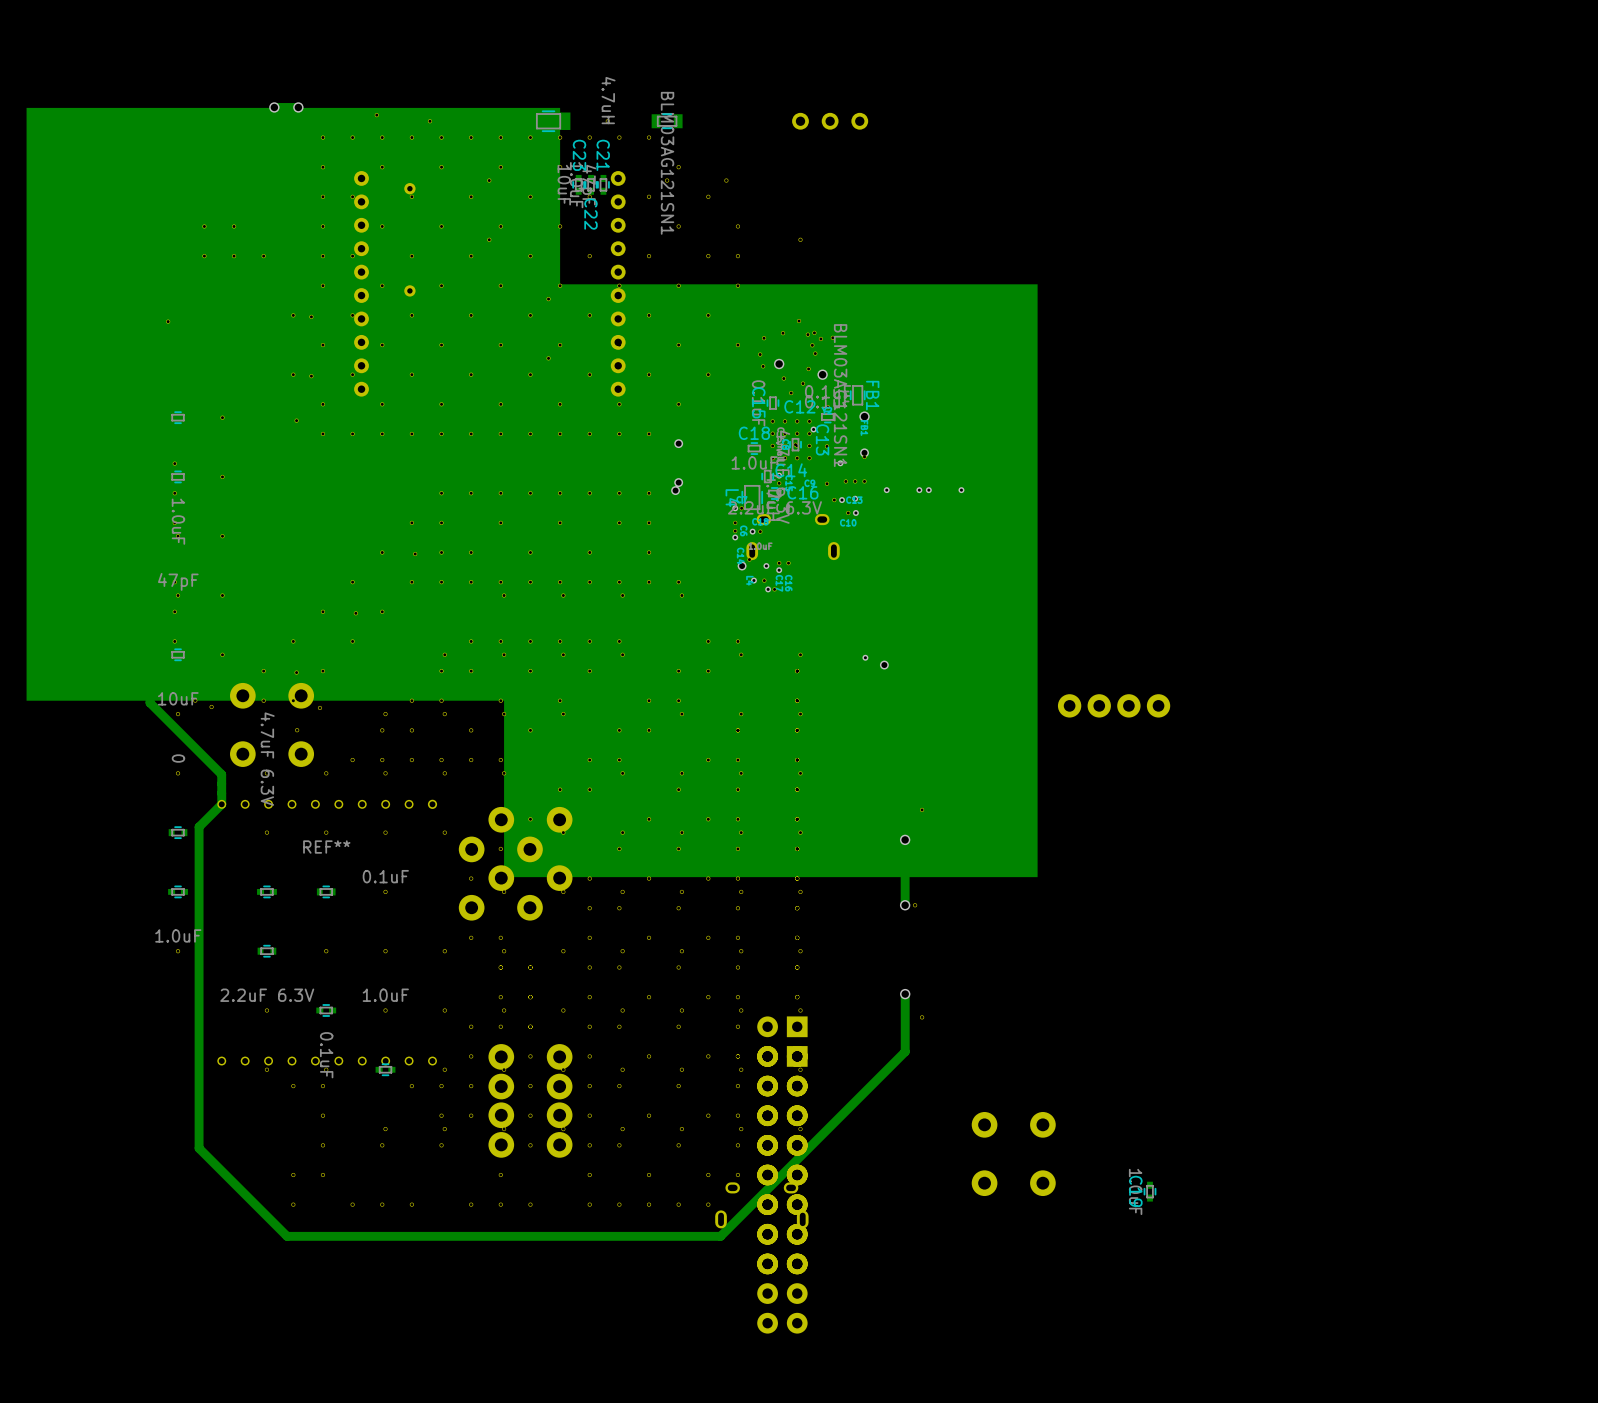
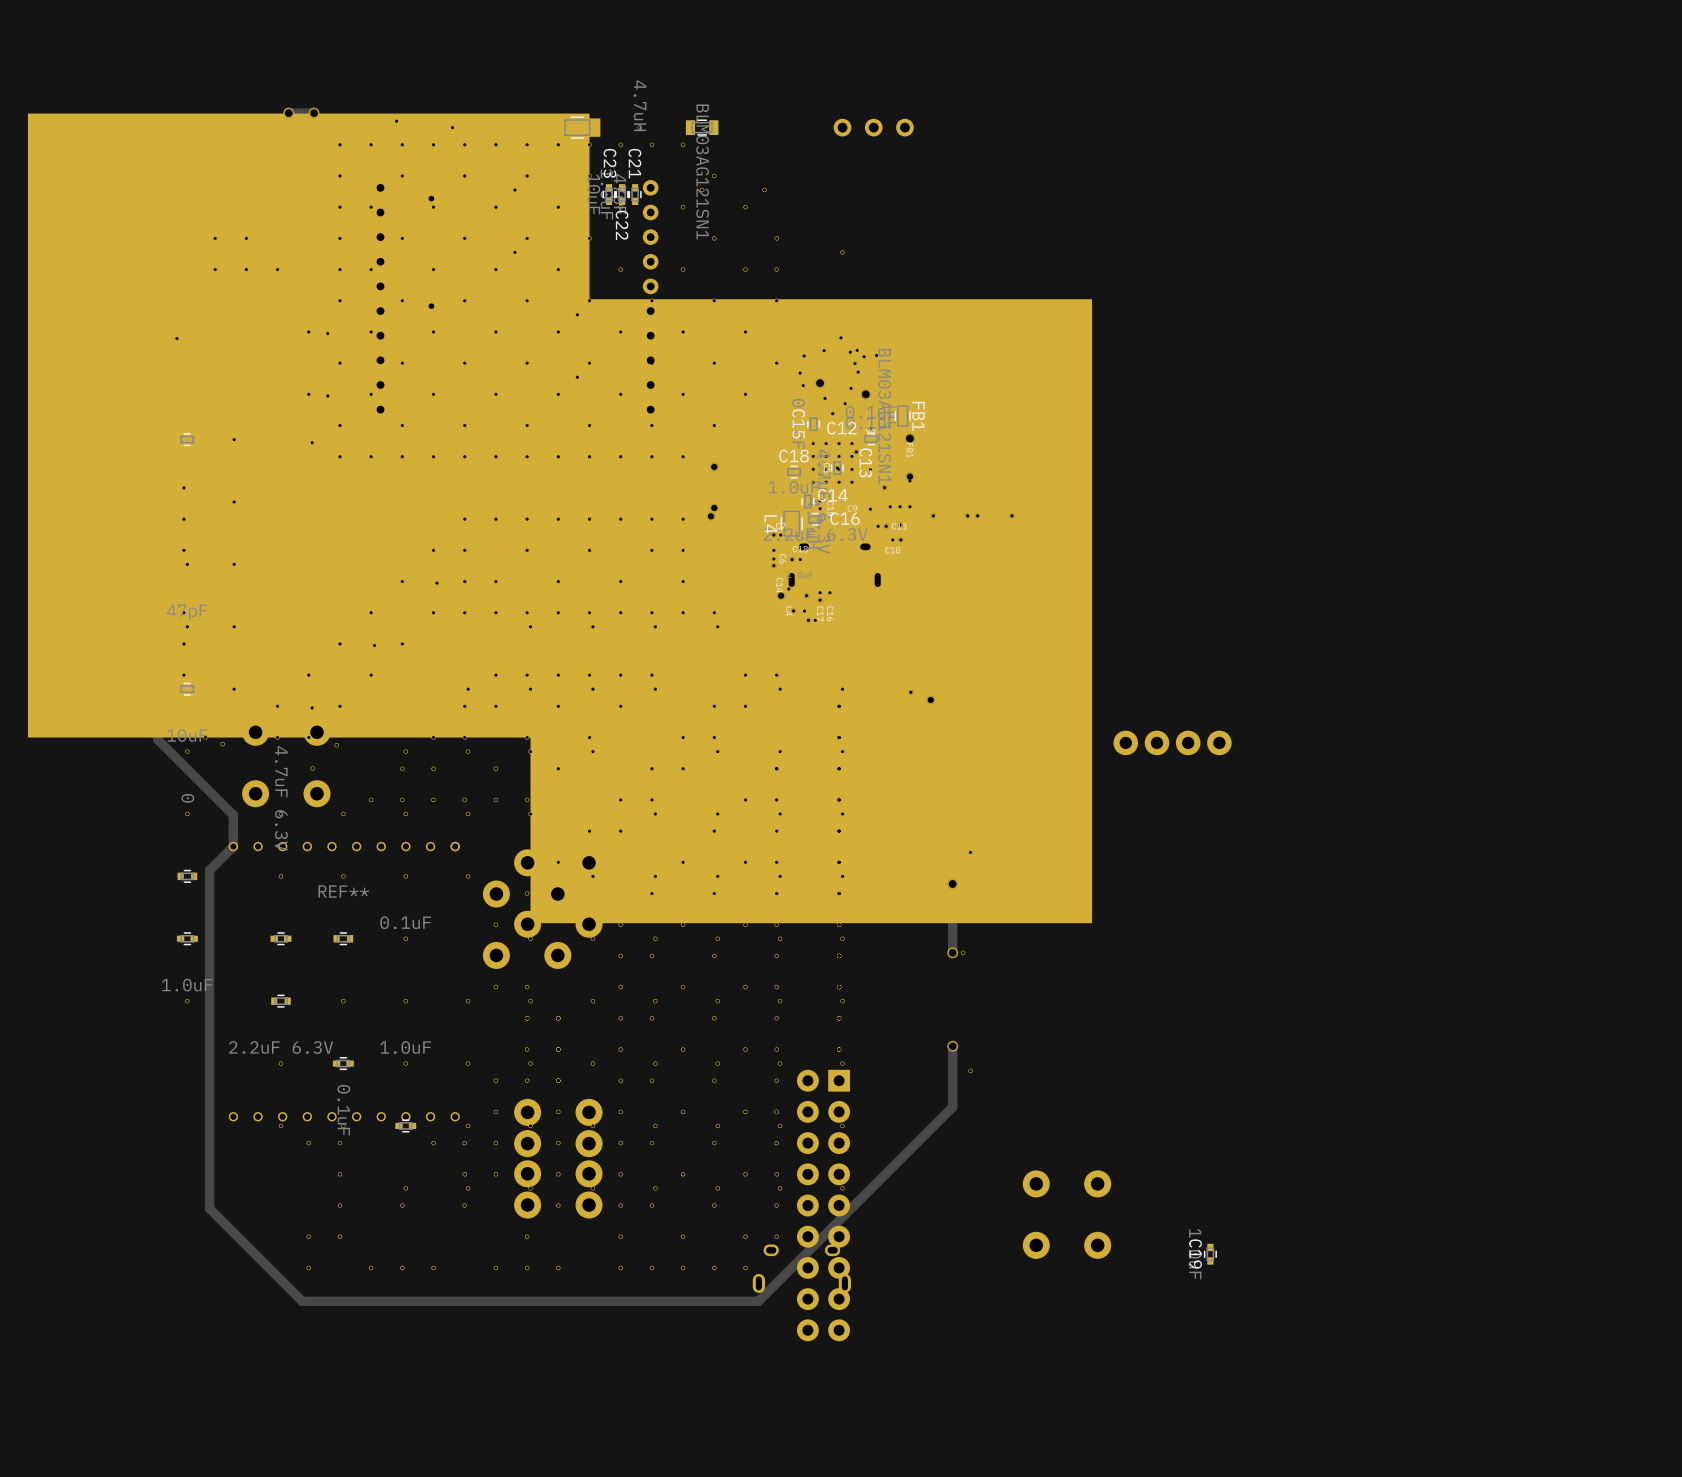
part: (178, 476) -> none
part value: 1.0uF (178, 521) -> none
part: (782, 1189) -> none

